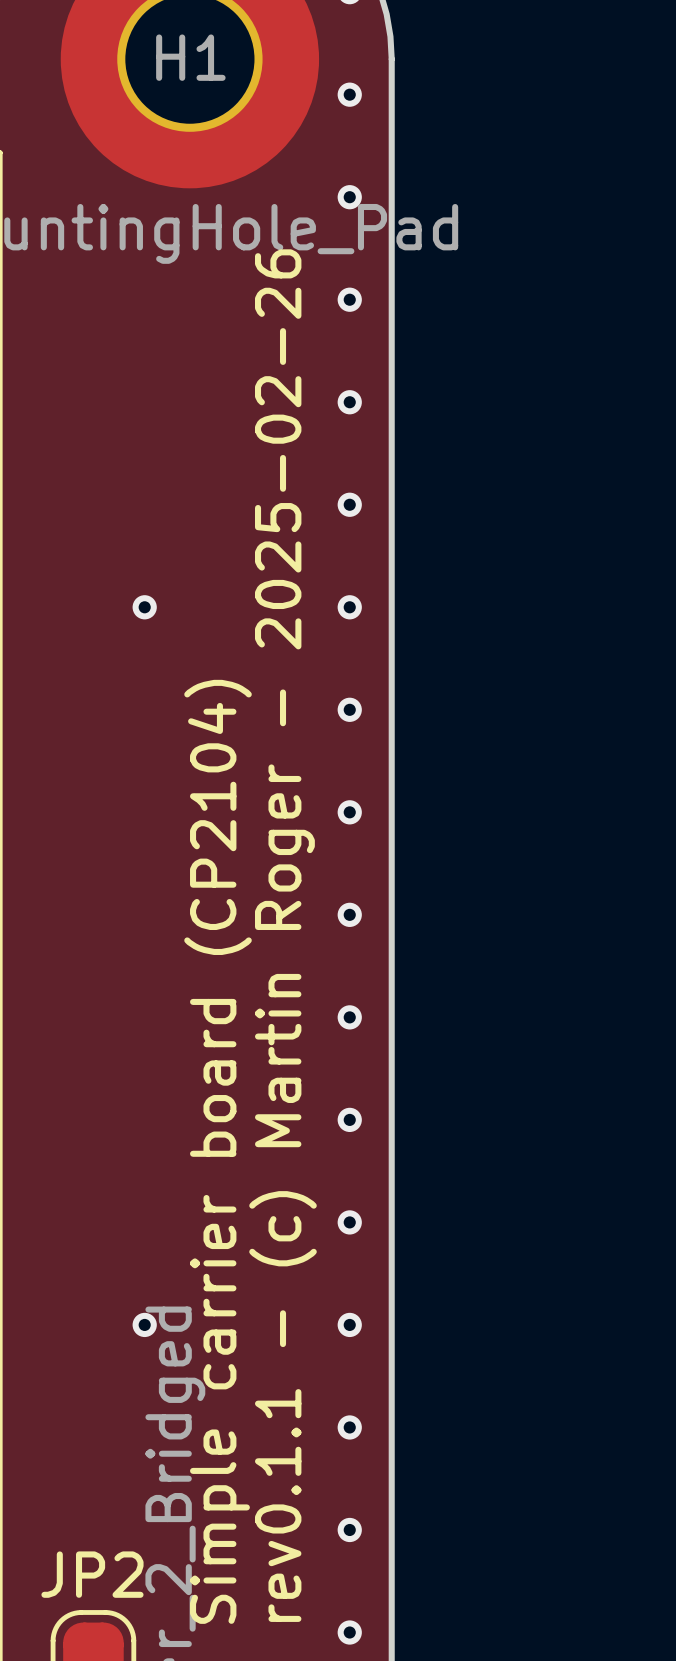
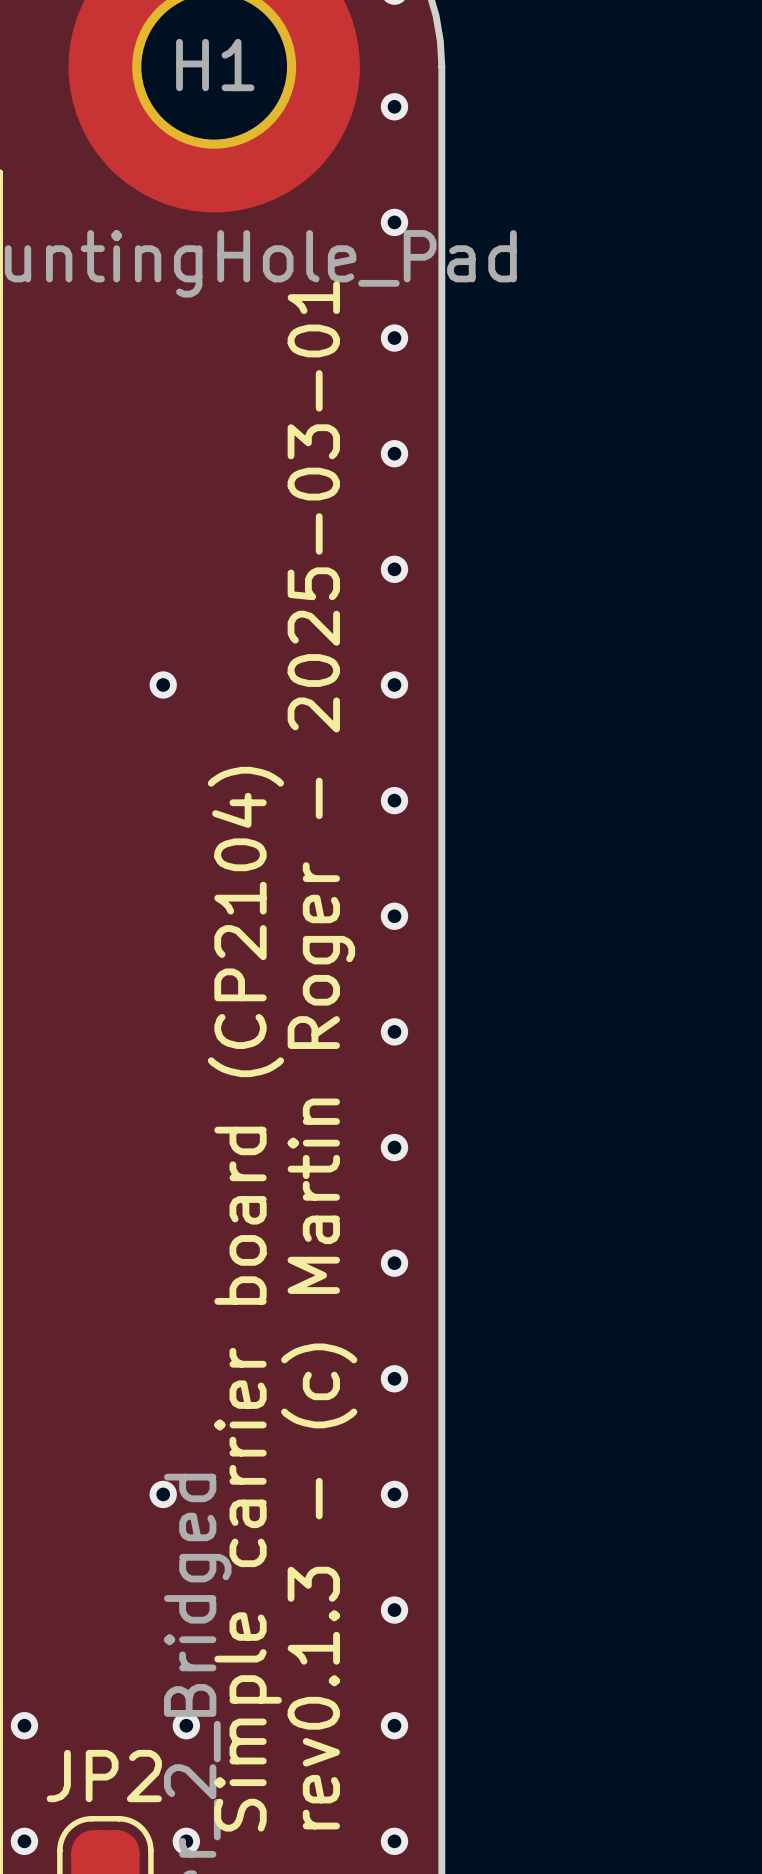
text: rev0.1.1 - (c) Martin Roger - 2025-02-26 (283, 935) -> rev0.1.3 - (c) Martin Roger - 2025-03-01 (319, 1055)
via: none -> (24, 1725)
via: none -> (186, 1725)
via: none -> (24, 1841)
via: none -> (186, 1841)

